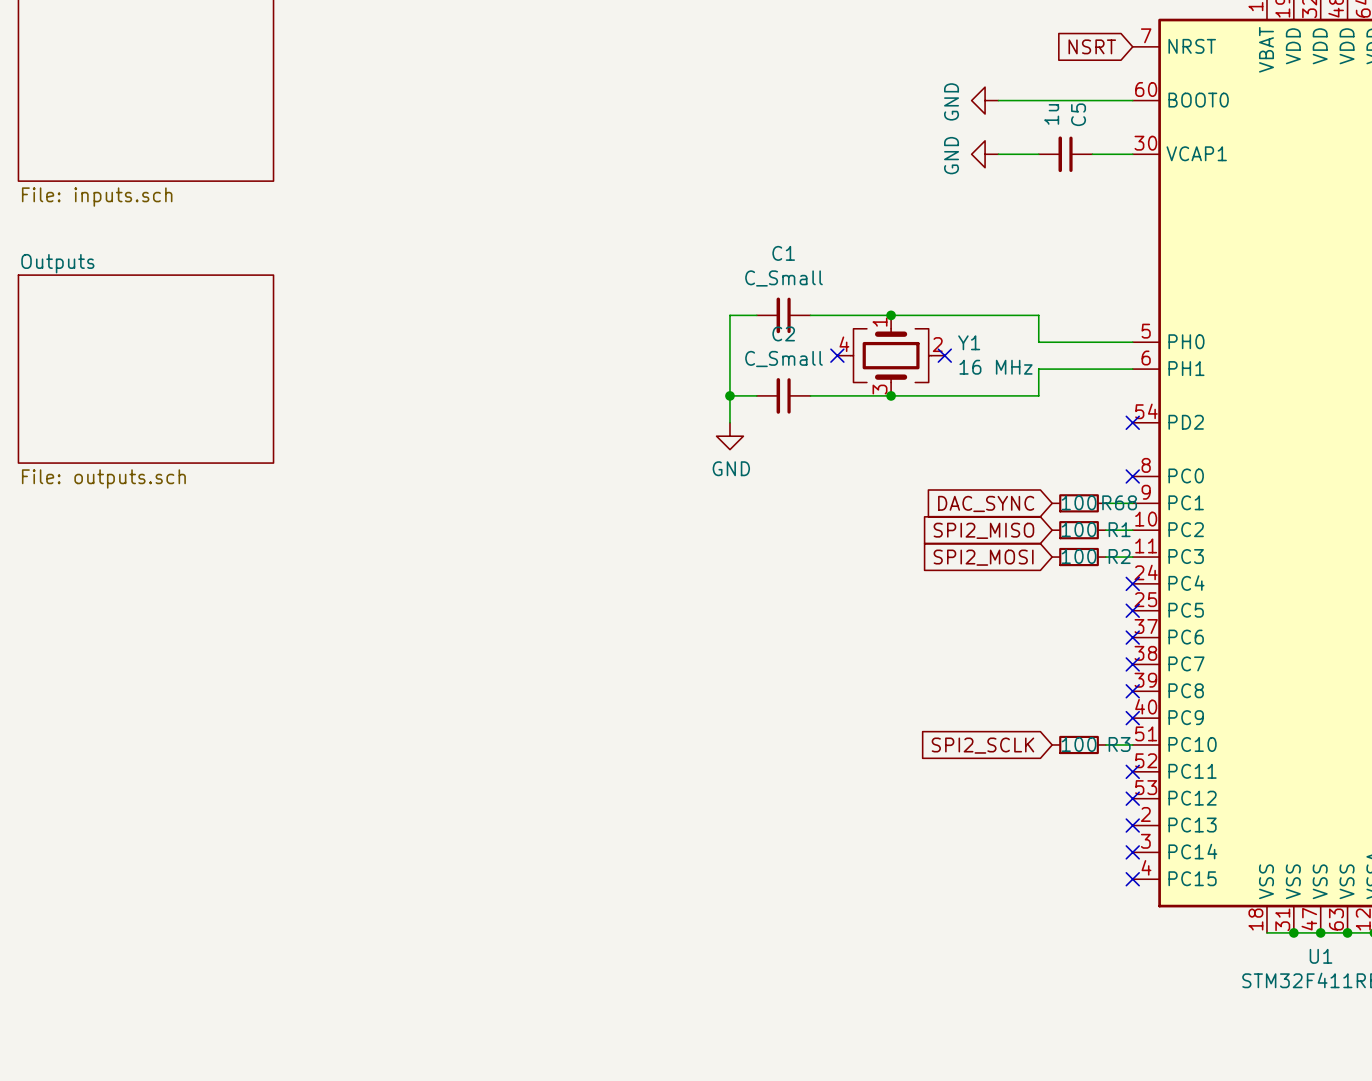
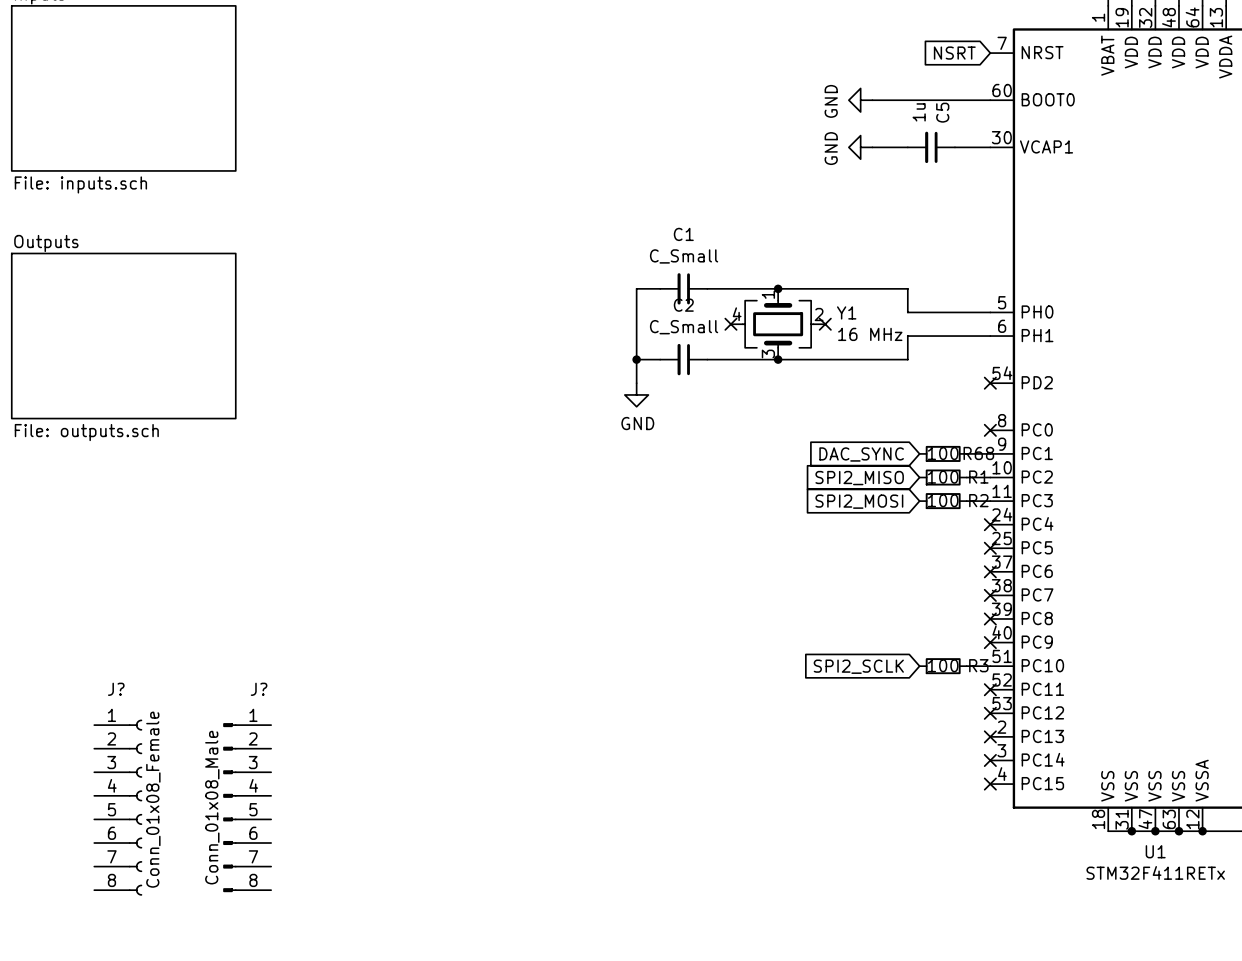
J?: none -> Conn_01x08_Female (118, 807)
J?: none -> Conn_01x08_Male (247, 807)

